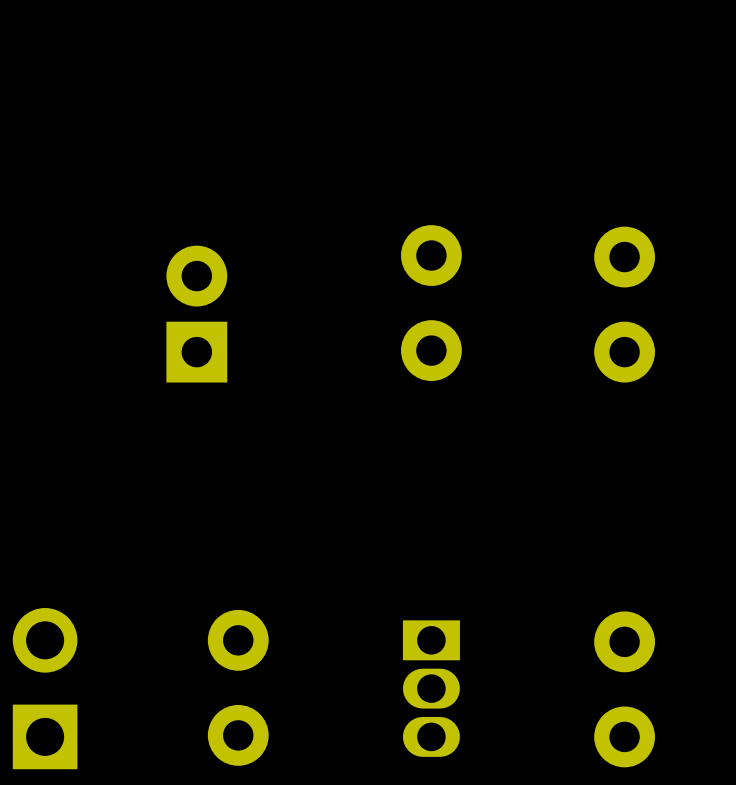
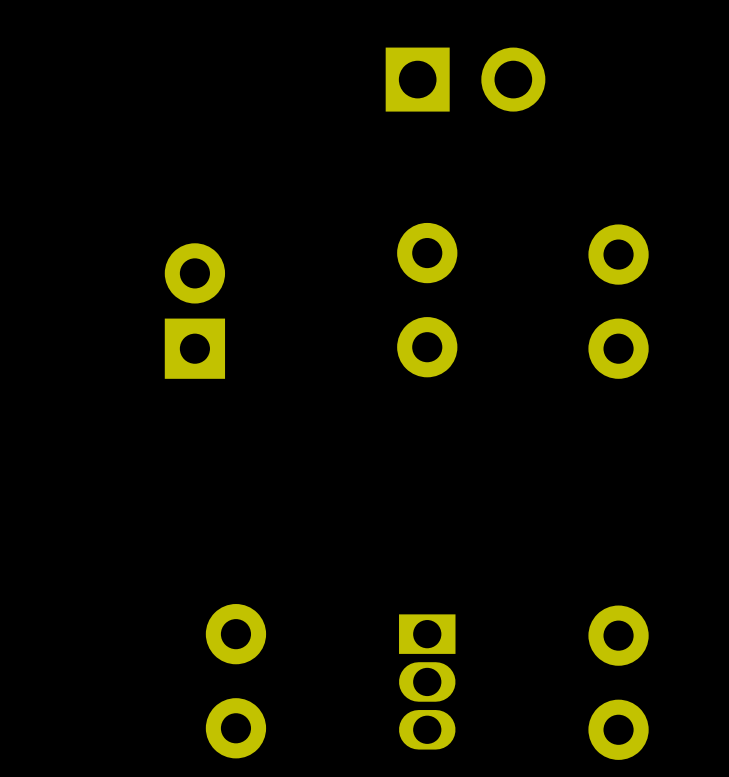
part rotation: 0° (45, 688) -> 90° clockwise (465, 79)
part position: (45, 688) -> (465, 79)

